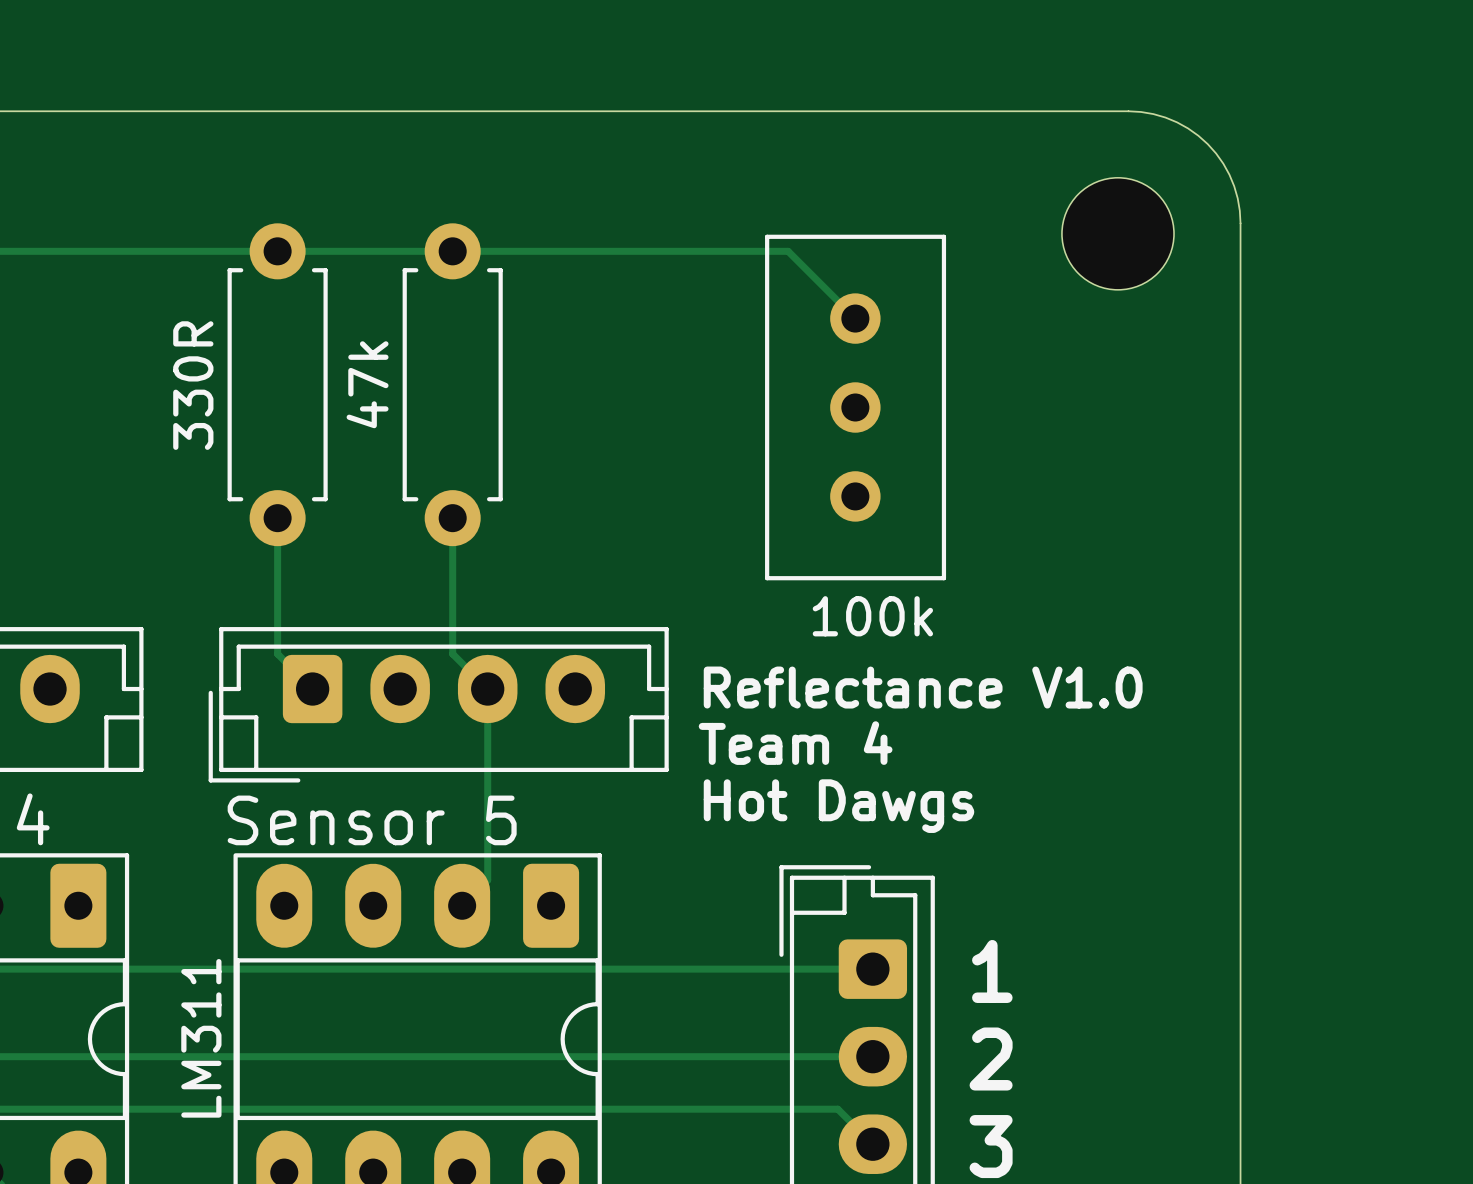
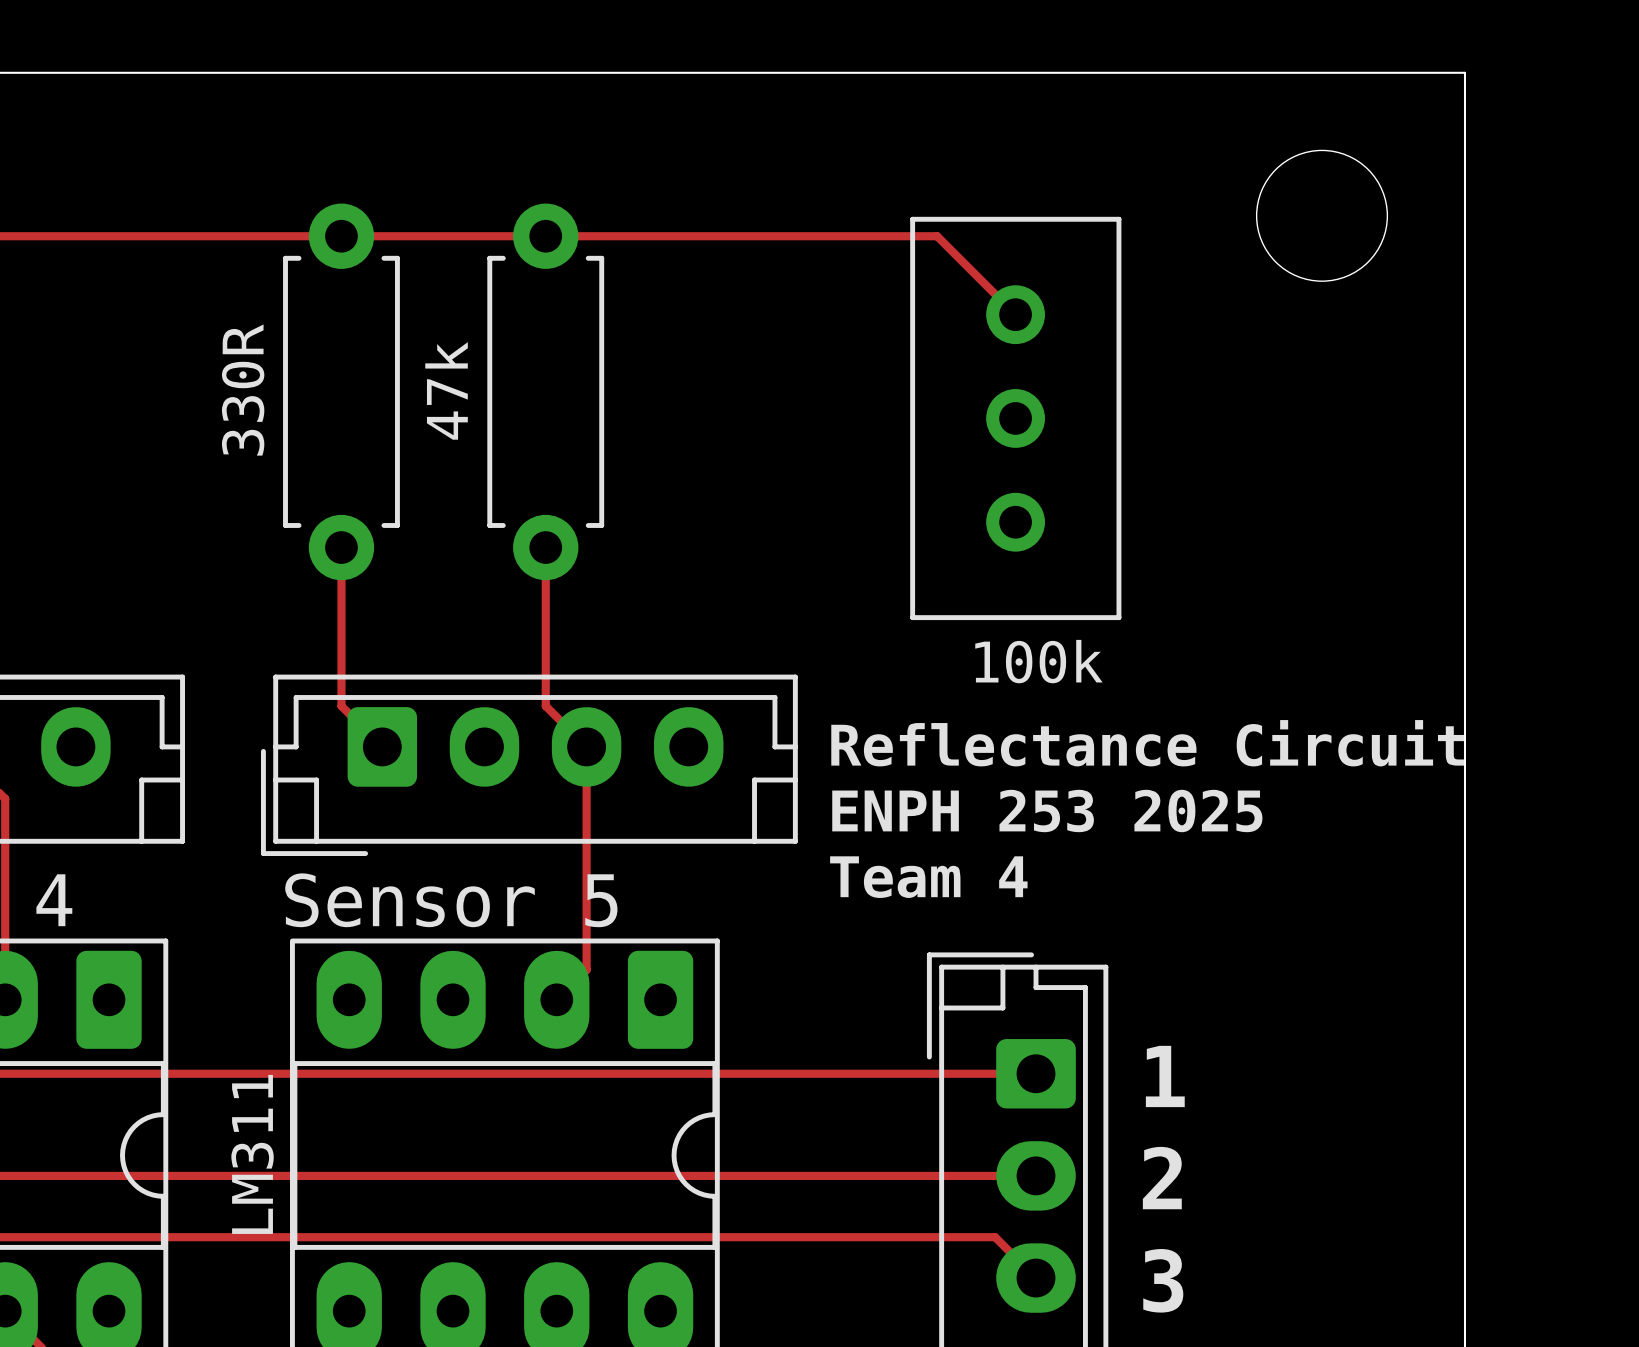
board edge: (1128, 111) (1153, 114) (1177, 122) (1207, 144) (1223, 163) (1234, 186) (1240, 223) -> (1334, 72) (1464, 72) (1464, 203)
text: Reflectance V1.0 (923, 687) -> Reflectance Circuit (1147, 743)
text: Team 4 (795, 743) -> ENPH 253 2025 (1047, 811)
text: Hot Dawgs (838, 806) -> Team 4 (928, 877)

